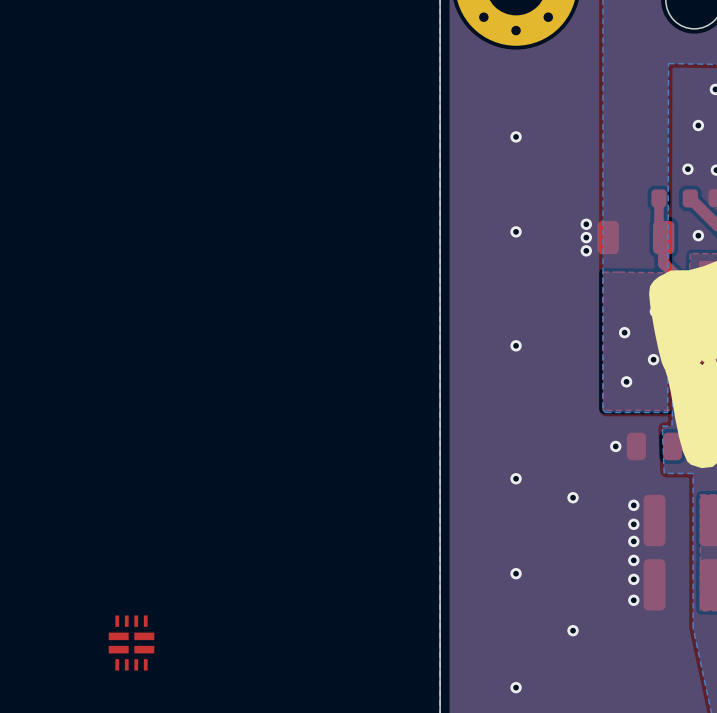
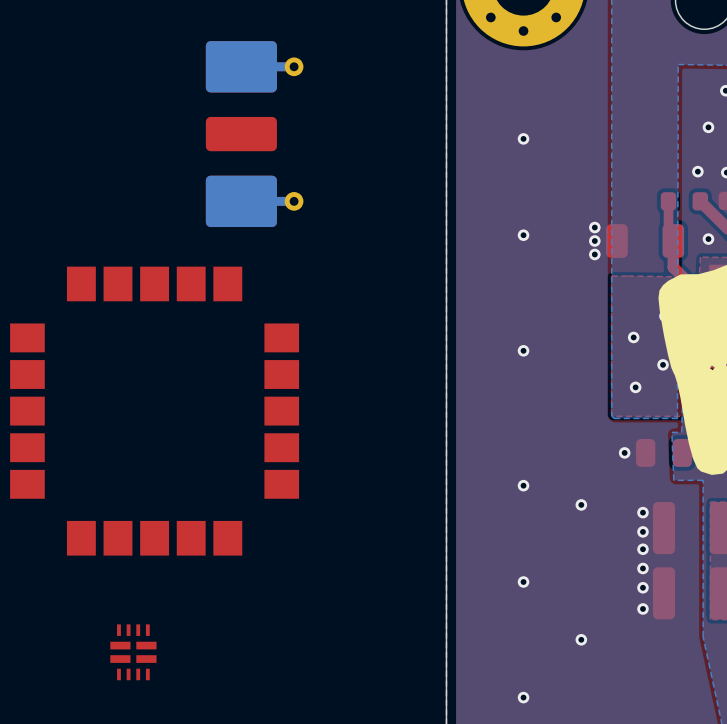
part: none -> (254, 134)
part: none -> (154, 411)

